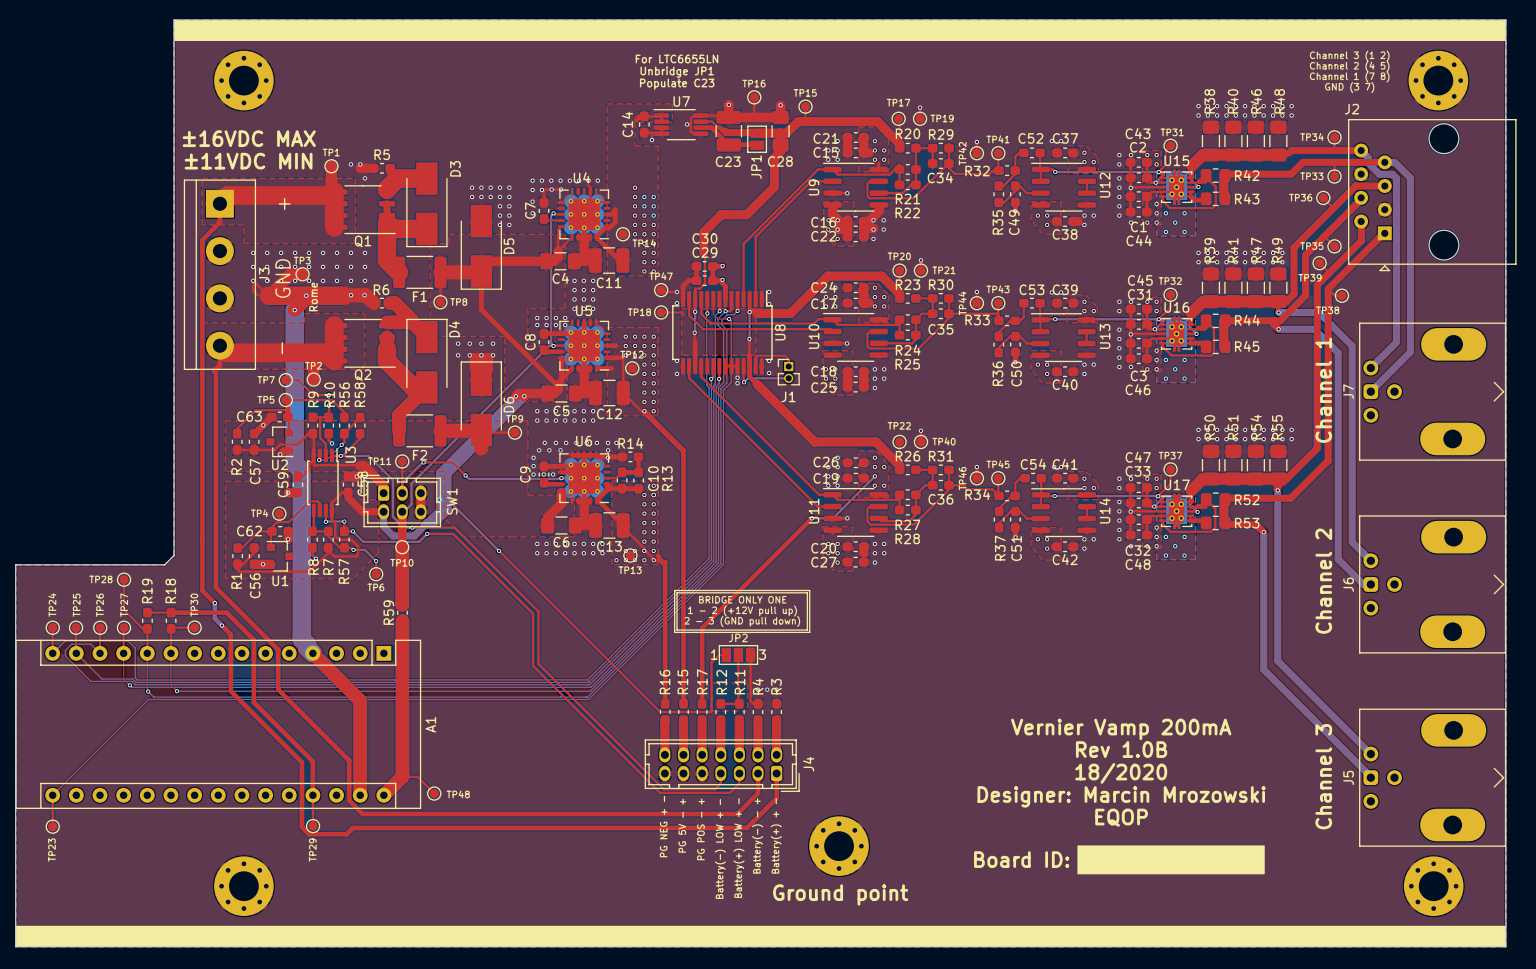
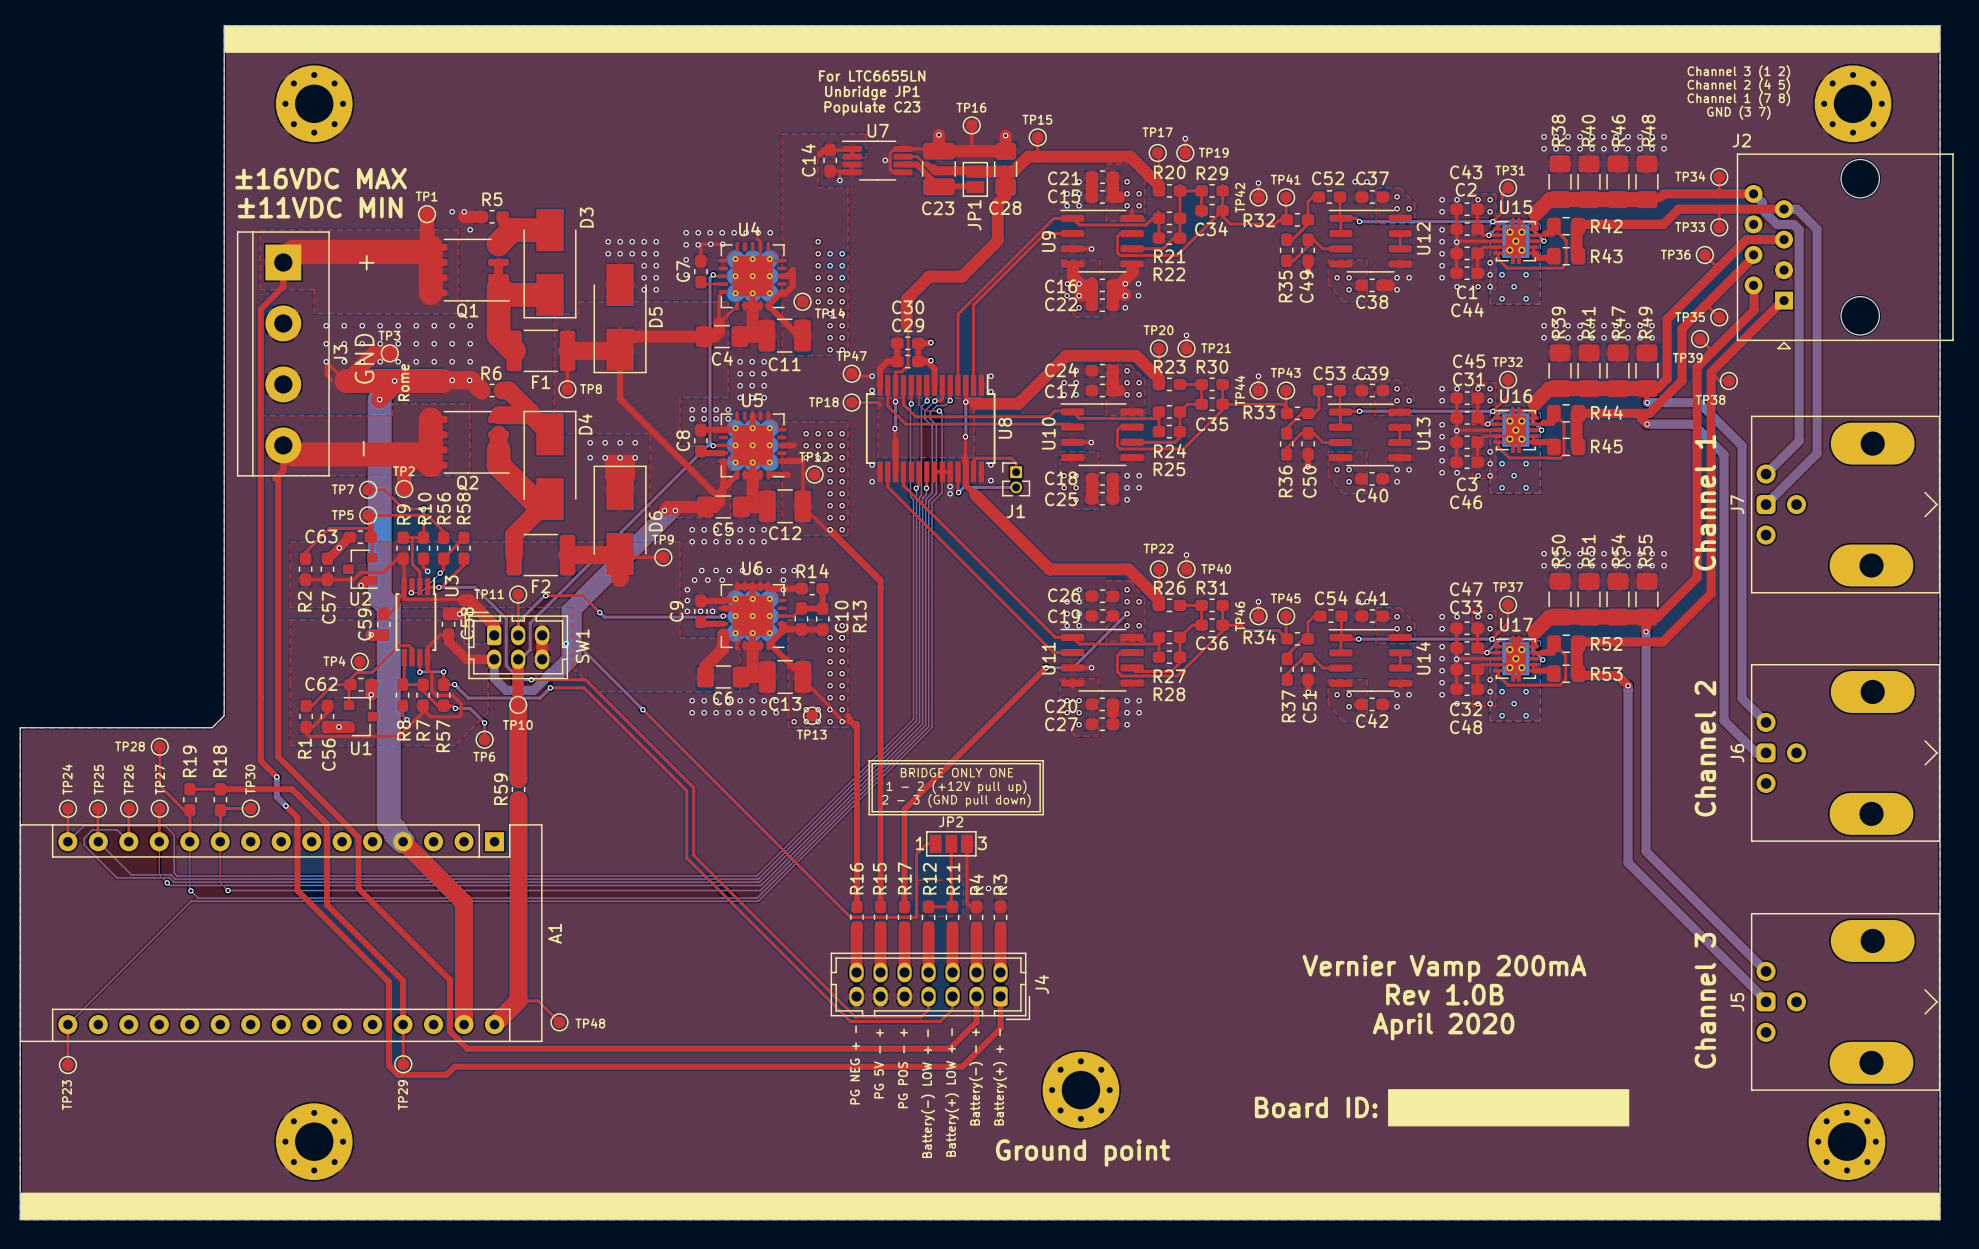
text: Vernier Vamp 200mA (1121, 729) -> none
text: Rev 1.0B (1121, 749) -> Vernier Vamp 200mA (1444, 968)
text: 18/2020 (1121, 773) -> Rev 1.0B (1444, 994)
text: Designer: Marcin Mrozowski (1121, 796) -> April 2020 (1443, 1026)
text: EQOP (1121, 817) -> none

